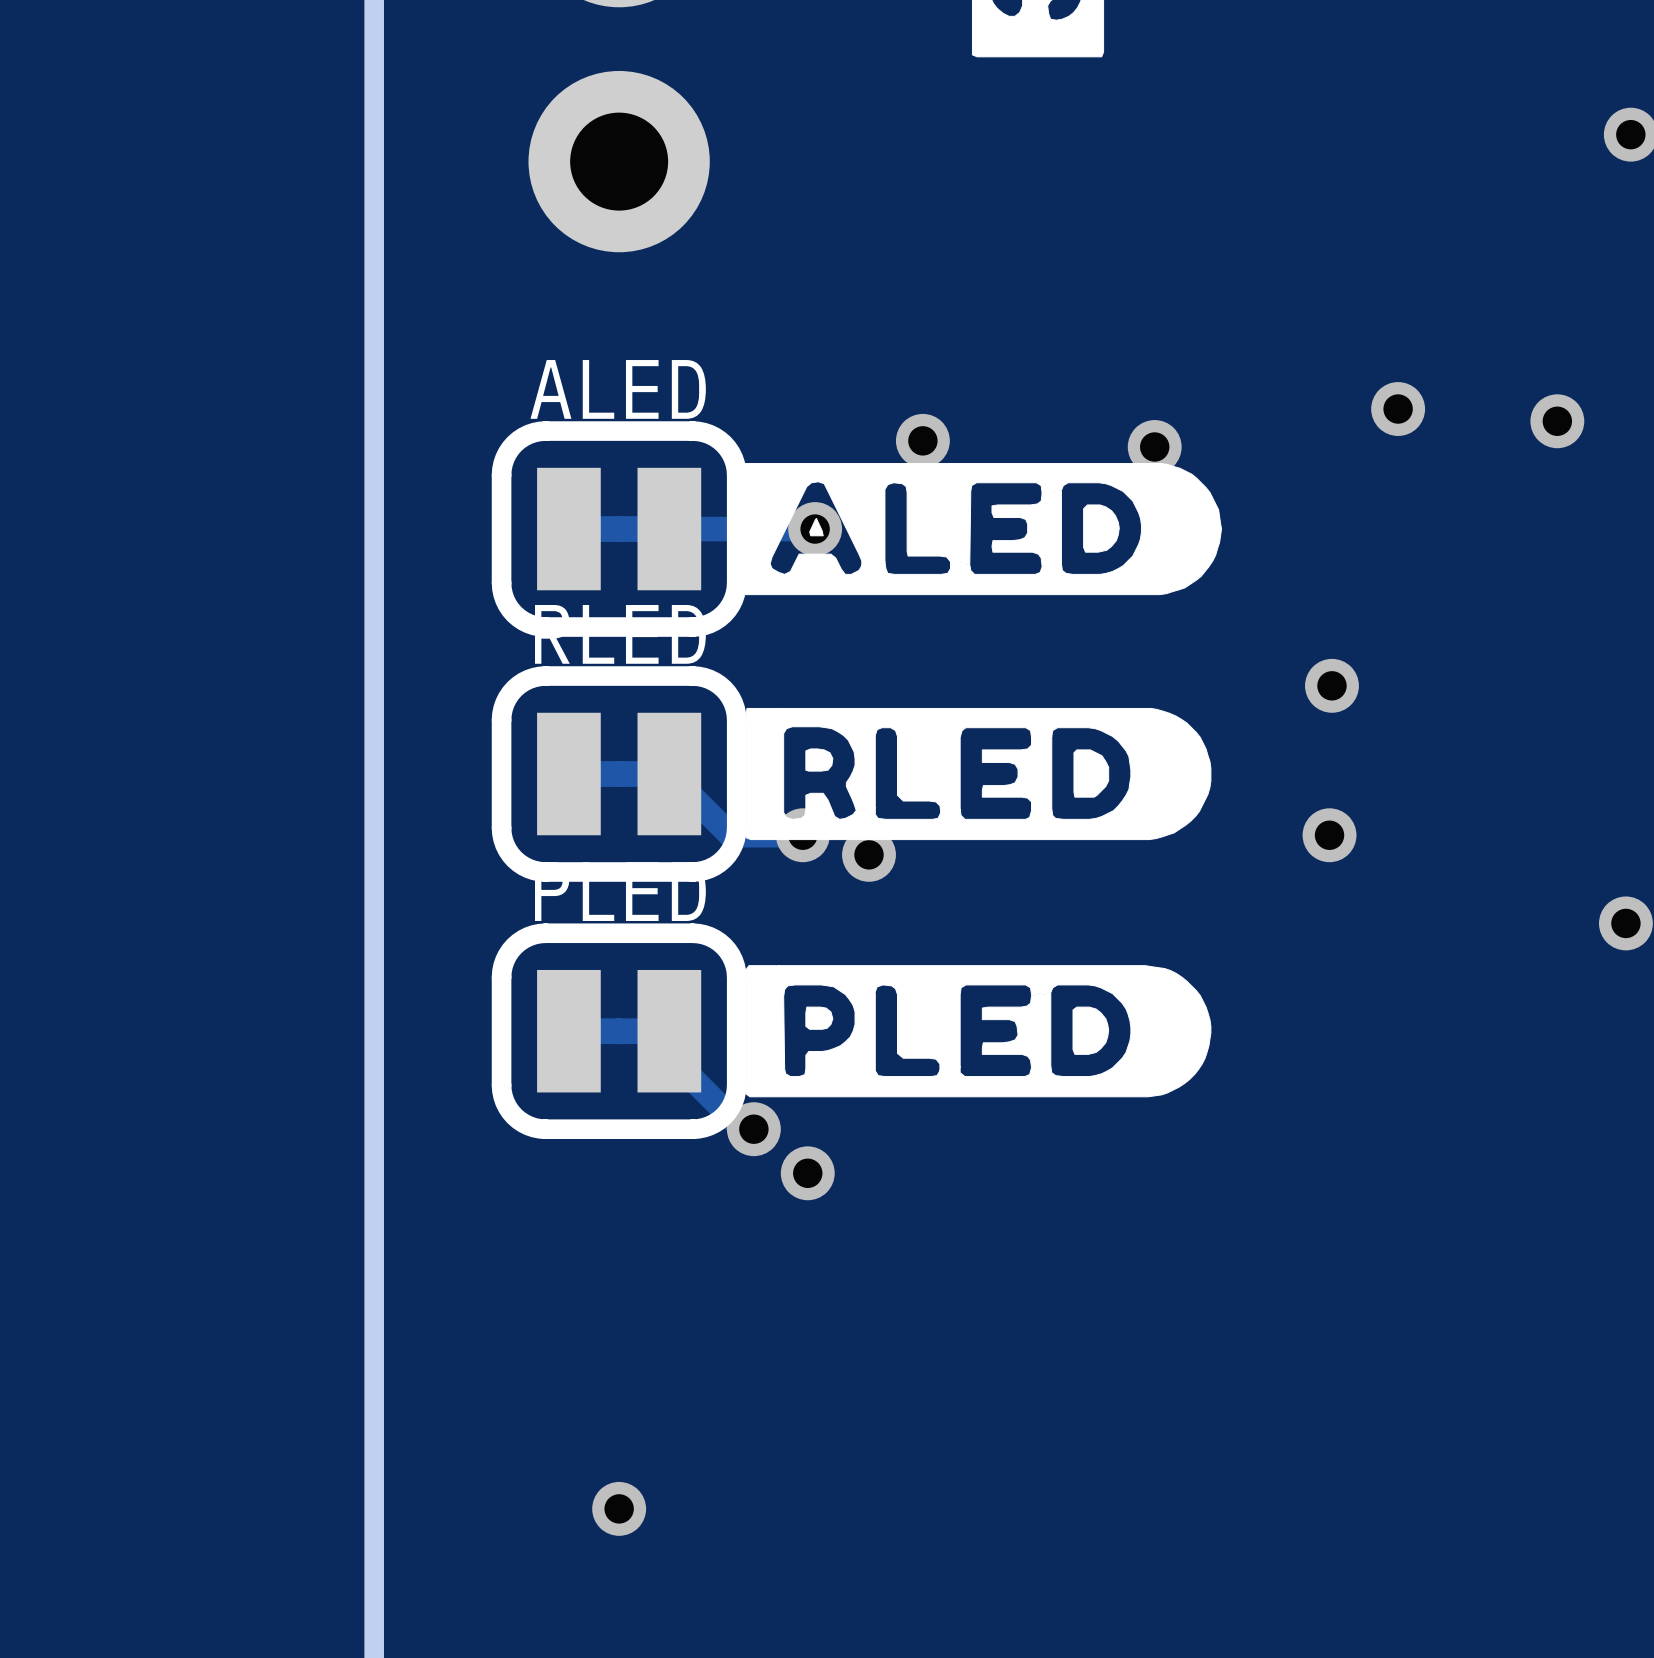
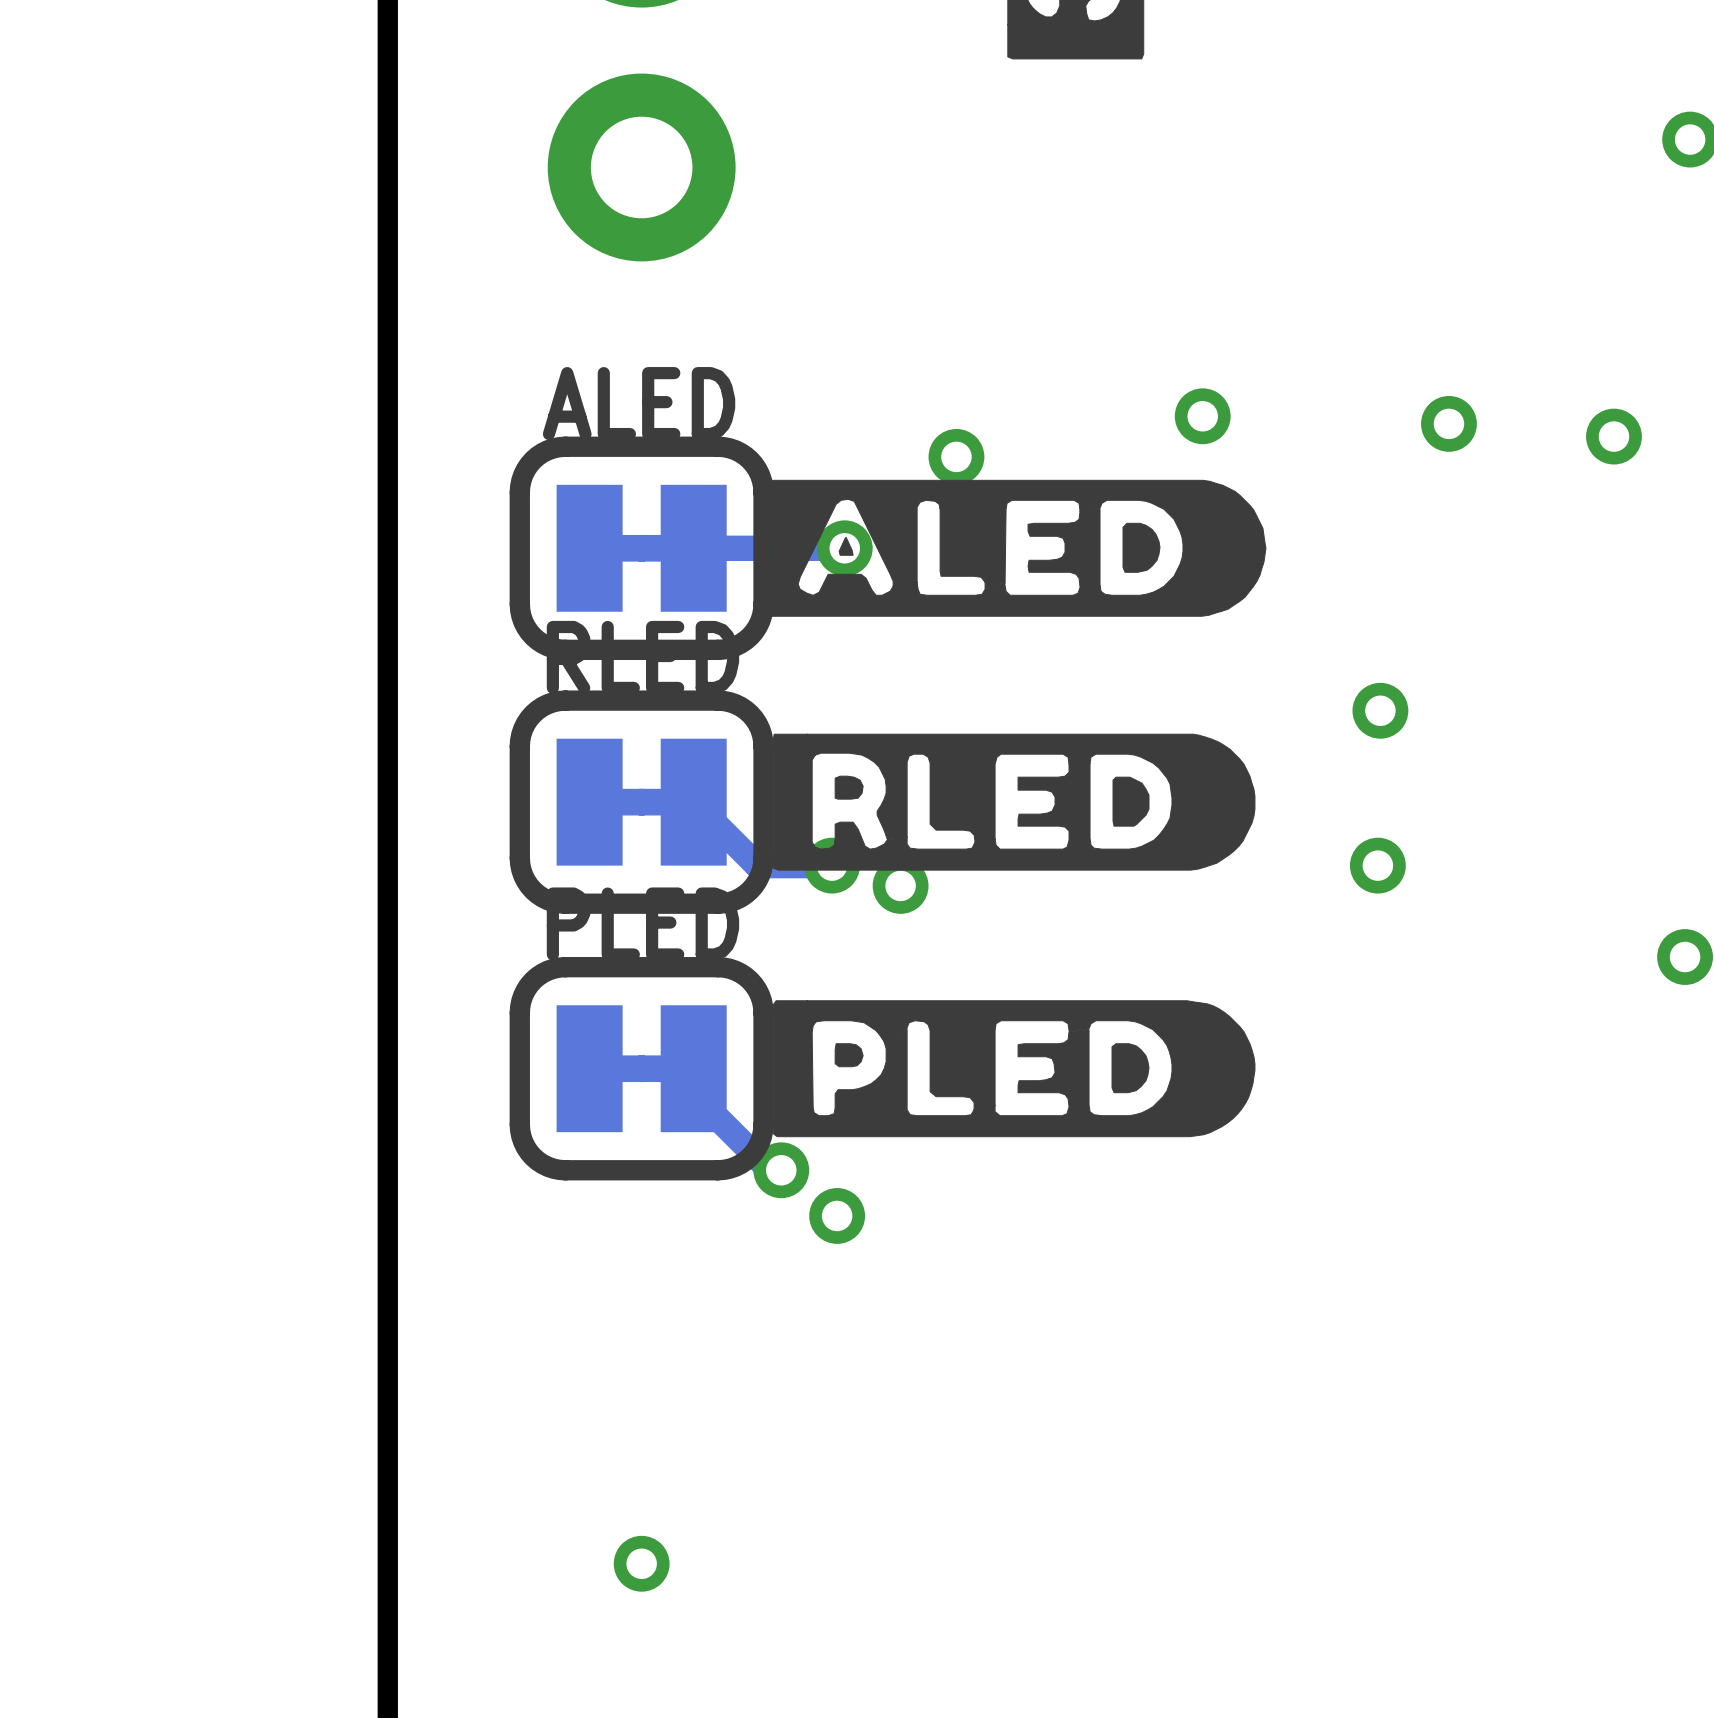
via position: (1154, 447) -> (1202, 416)

